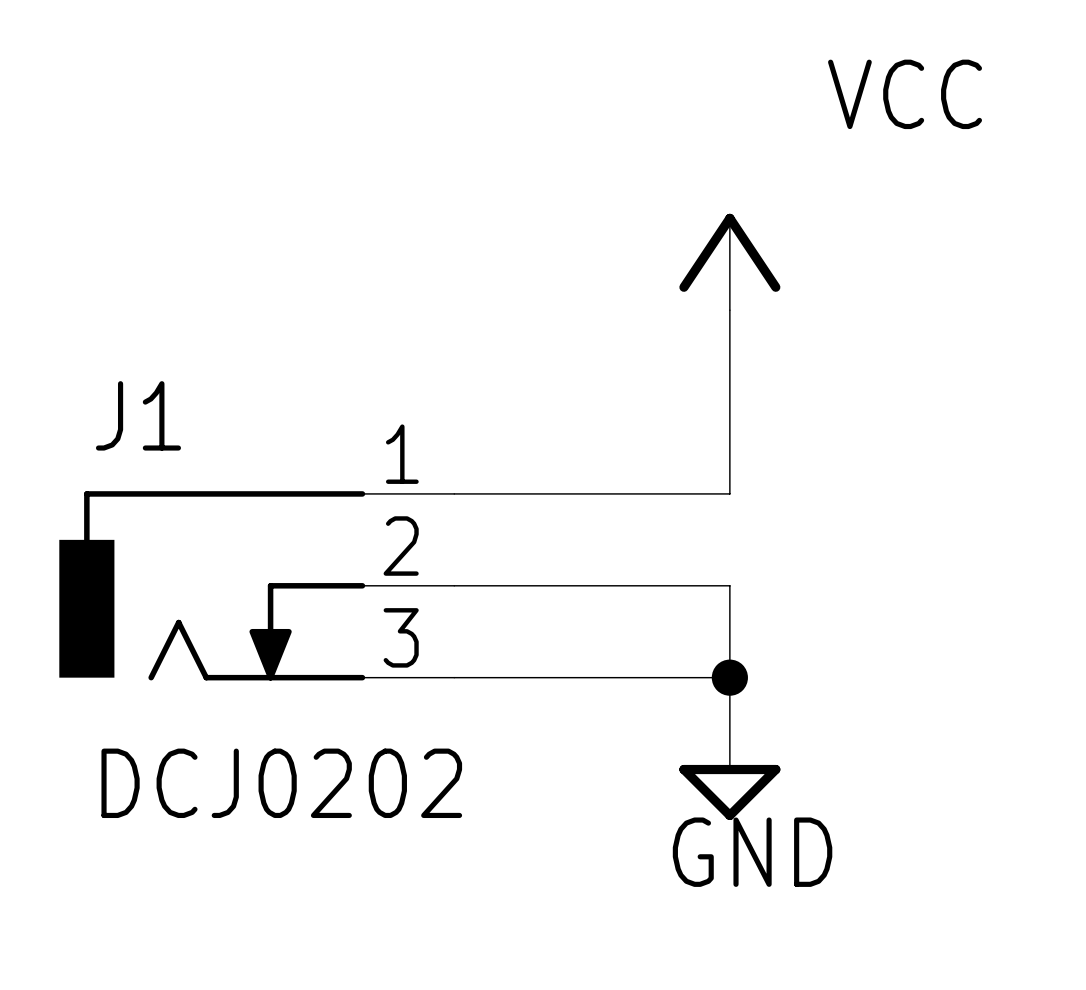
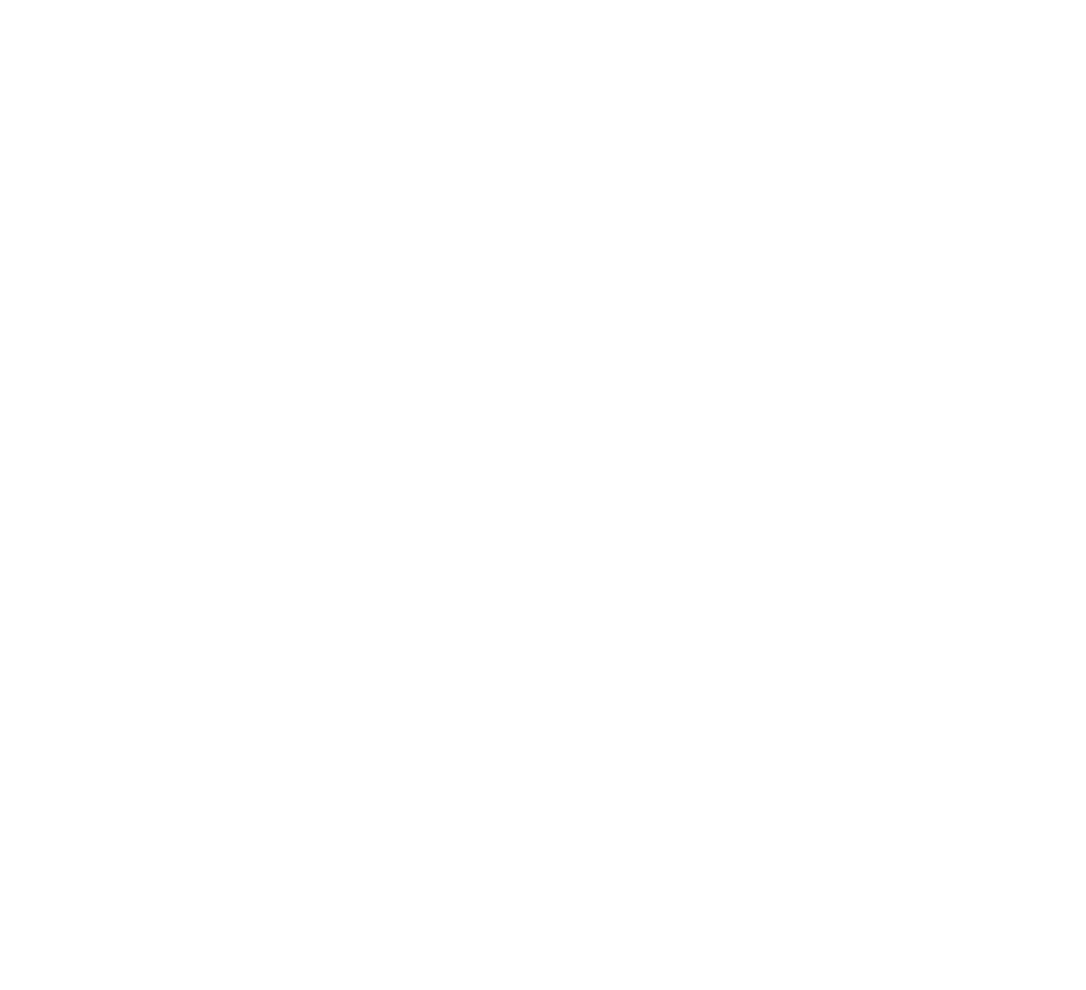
power symbol: VCC (729, 262) -> none
wire: (729, 310) (729, 493) (454, 493) -> none
J1: DCJ0202 (256, 585) -> none
wire: (454, 585) (729, 585) (729, 677) (454, 677) -> none
junction: (729, 677) -> none
power symbol: GND (729, 748) -> none

